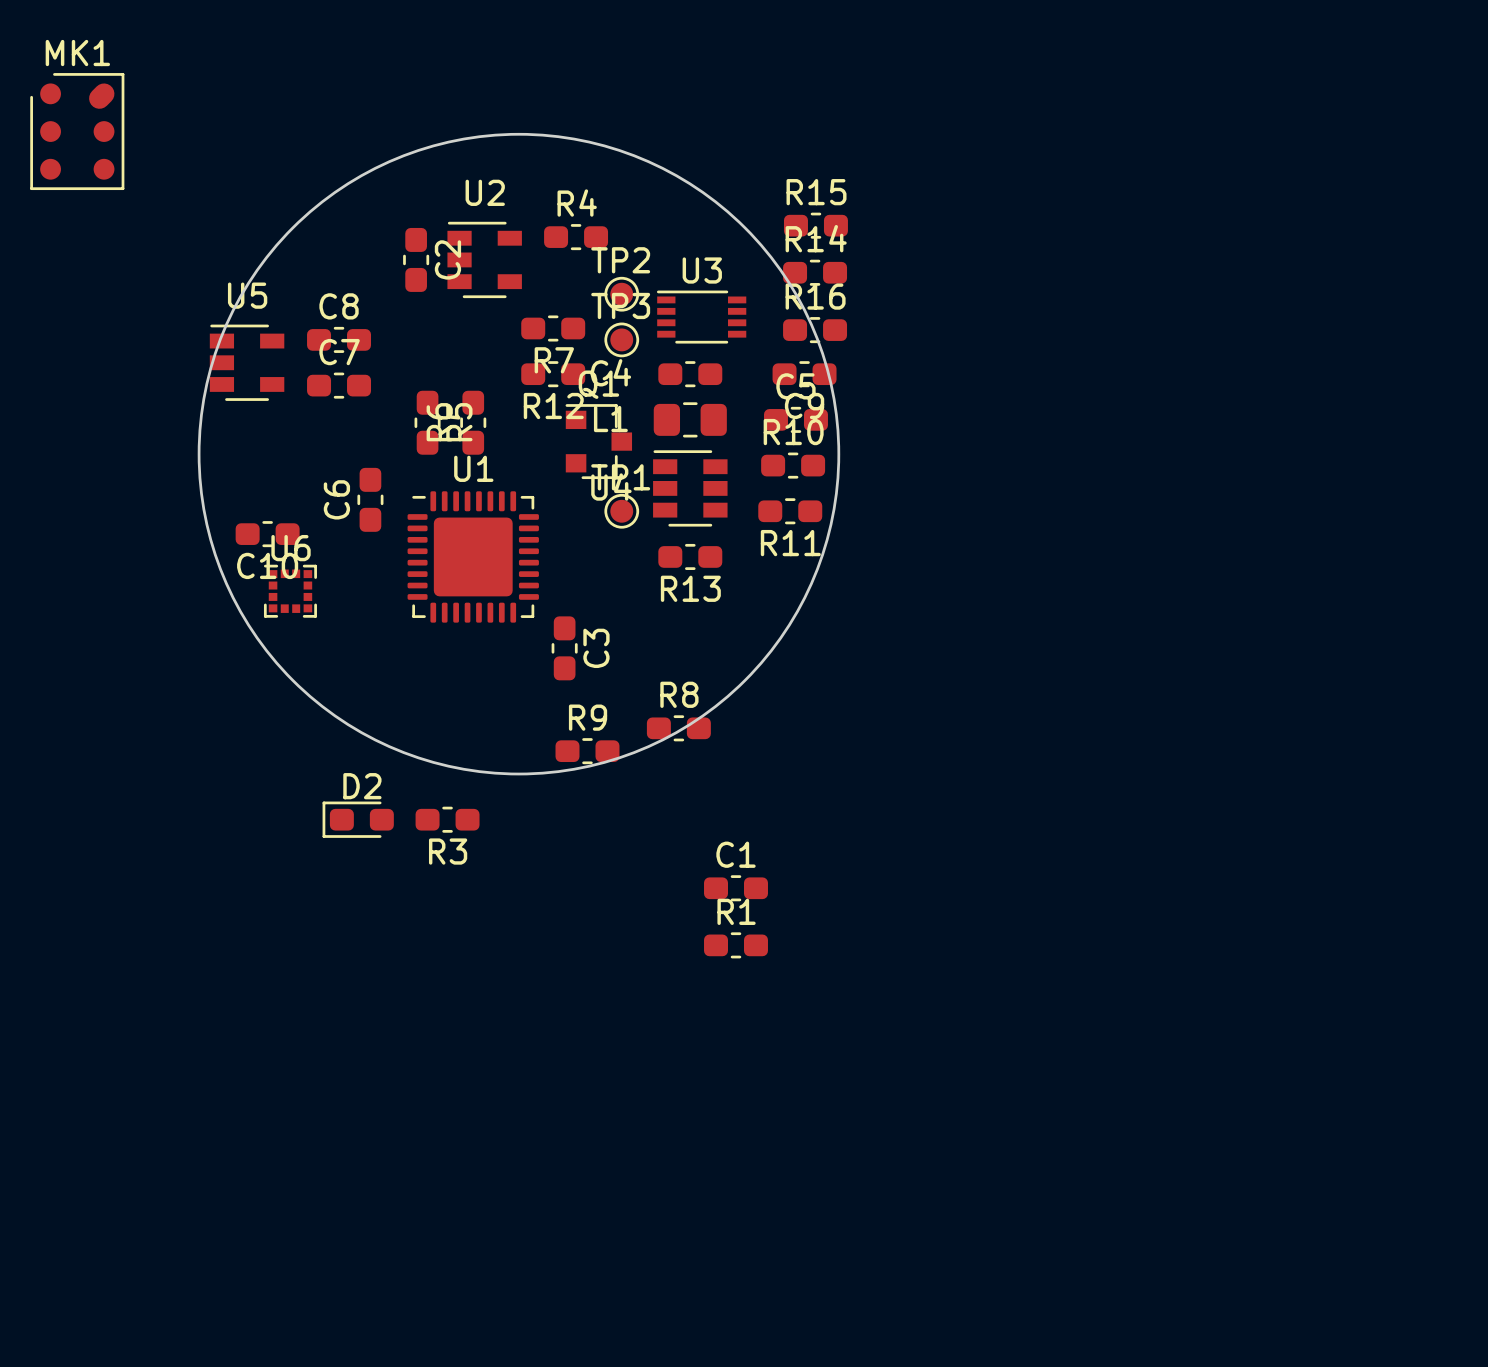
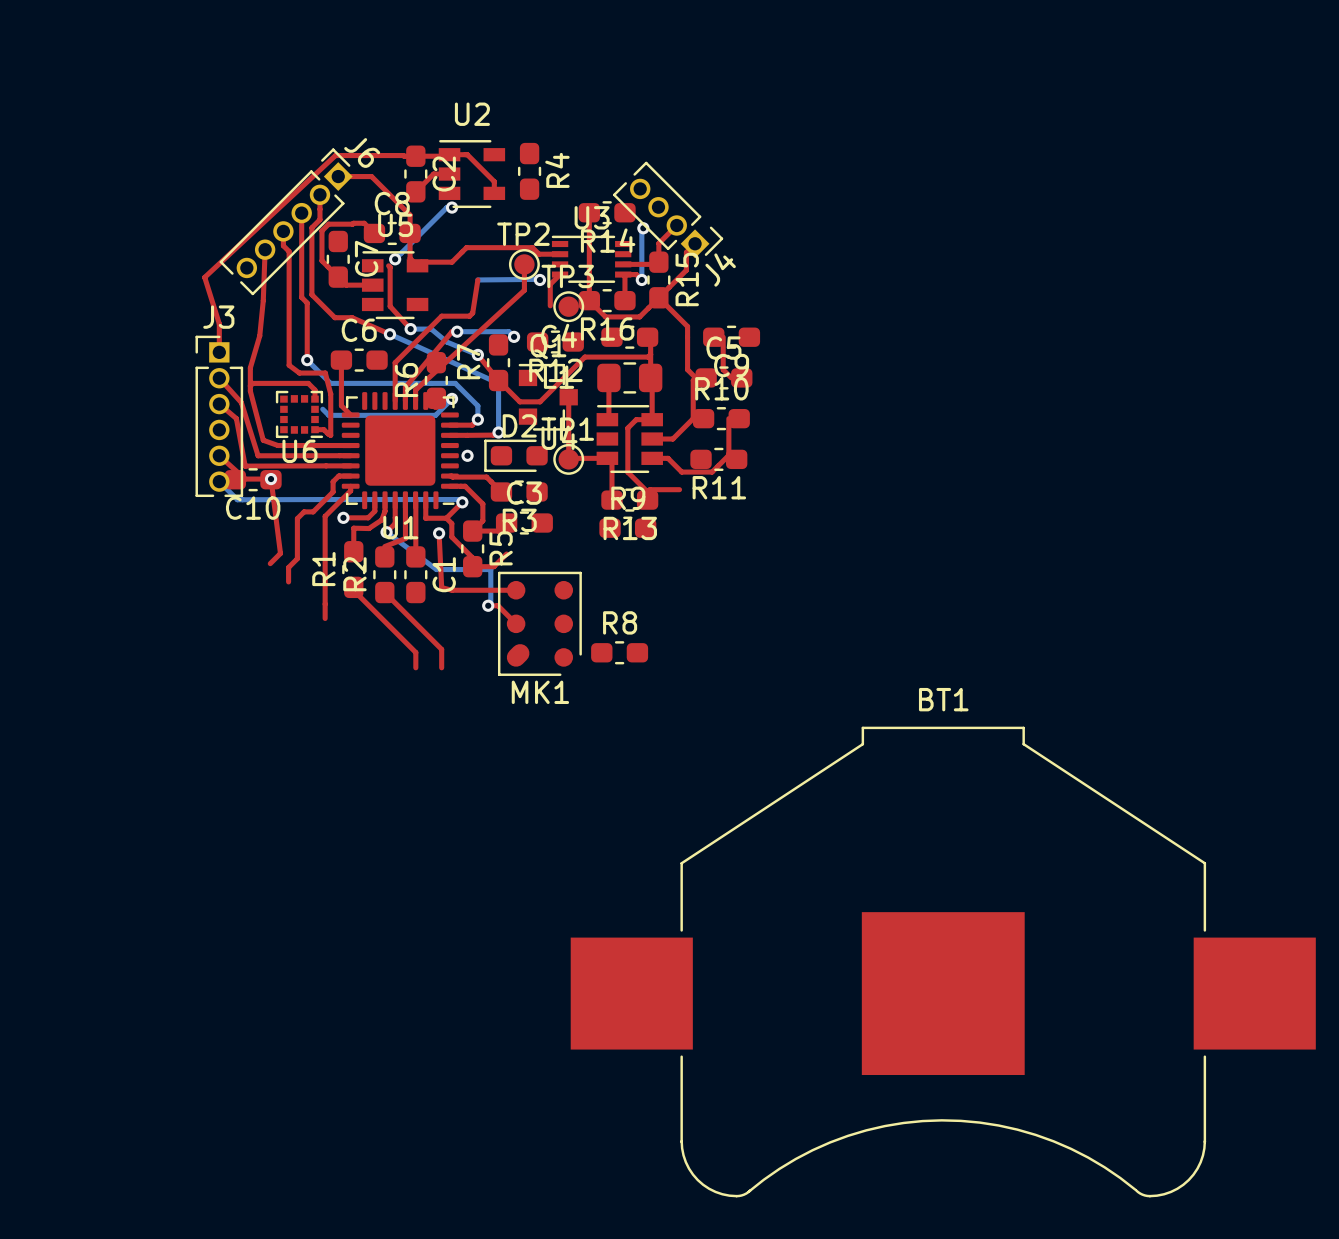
MK1 rotation: 0° (77, 131) -> 180° (539, 623)
MK1 position: (77, 131) -> (539, 623)
round board edge: [197, 132, 841, 776] -> none
top track: none -> (449, 174) (433, 174) (415, 191)
top track: none -> (338, 176) (371, 176) (410, 215) (410, 258) (417, 265) (421, 262) (452, 262) (466, 247) (532, 247) (539, 254) (560, 254)
top track: none -> (494, 193) (494, 181) (467, 154) (335, 155) (204, 277) (219, 323) (219, 352)
top track: none -> (319, 194) (319, 219) (311, 227) (311, 294) (334, 317) (352, 317) (389, 334)
R15 rotation: 0° (815, 225) -> 90° clockwise (658, 279)
R15 position: (815, 225) -> (658, 279)
bottom track: none -> (452, 207) (446, 207) (395, 259)
via: none -> (452, 207)
J4: none -> (668, 209)
top track: none -> (301, 213) (301, 297) (307, 303) (307, 360)
top track: none -> (589, 212) (589, 300) (605, 316) (639, 316) (686, 270) (686, 252) (695, 243)
R4 rotation: 0° (576, 237) -> 90° clockwise (529, 171)
R4 position: (576, 237) -> (529, 171)
R14 name position: R14 (816, 238) -> R14 (608, 240)
J6: none -> (286, 221)
top track: none -> (676, 225) (658, 243) (658, 262) (656, 264) (623, 264)
bottom track: none -> (643, 228) (641, 279)
via: none -> (643, 228)
top track: none -> (283, 231) (283, 245) (289, 251) (289, 365) (299, 373) (325, 373) (330, 393) (330, 435) (323, 429) (315, 429)
top track: none -> (374, 233) (364, 223) (328, 224) (321, 230) (321, 260) (346, 285) (372, 285)
C2 position: (416, 259) -> (415, 174)
U2 position: (484, 259) -> (471, 174)
R14 position: (815, 272) -> (607, 212)
top track: none -> (265, 249) (259, 335) (250, 367) (250, 391) (263, 440) (277, 445) (350, 445)
via: none -> (395, 259)
top track: none -> (524, 264) (524, 290) (415, 390) (415, 400)
top track: none -> (388, 265) (390, 306) (410, 329)
TP2 position: (621, 294) -> (524, 264)
R16 name position: R16 (815, 296) -> R16 (607, 329)
top track: none -> (560, 274) (550, 284) (550, 305)
top track: none -> (477, 279) (472, 313) (469, 316) (441, 316) (395, 362) (395, 400)
bottom track: none -> (477, 279) (539, 279)
via: none -> (539, 279)
top track: none -> (641, 279) (636, 274) (623, 274) (624, 276) (624, 300)
via: none -> (641, 279)
U3 position: (701, 317) -> (591, 259)
R7 rotation: 0° (553, 328) -> 90° clockwise (498, 362)
R7 position: (553, 328) -> (498, 362)
top track: none -> (658, 297) (687, 326) (687, 369) (695, 377) (693, 380) (693, 418) (672, 439) (652, 439)
R16 position: (815, 330) -> (607, 300)
C8 position: (339, 339) -> (392, 233)
U5 position: (247, 362) -> (395, 285)
bottom track: none -> (410, 329) (431, 329) (446, 342) (477, 354)
via: none -> (410, 329)
top track: none -> (457, 331) (452, 331) (405, 387) (405, 400)
bottom track: none -> (457, 331) (508, 331) (514, 336)
via: none -> (457, 331)
bottom track: none -> (389, 334) (498, 383) (498, 432)
via: none -> (389, 334)
via: none -> (514, 336)
R12 position: (553, 374) -> (555, 342)
top track: none -> (647, 337) (650, 340) (652, 419) (636, 419) (627, 428) (627, 472) (647, 491) (649, 489) (679, 489)
top track: none -> (723, 337) (723, 369) (731, 377)
C7 rotation: 0° (339, 385) -> 90° clockwise (338, 259)
C7 position: (339, 385) -> (338, 259)
top track: none -> (650, 354) (648, 357) (584, 357) (540, 401) (519, 401) (498, 380) (477, 354)
via: none -> (477, 354)
bottom track: none -> (307, 360) (330, 383) (455, 383) (477, 405) (477, 419)
via: none -> (307, 360)
top track: none -> (341, 360) (341, 405) (350, 414)
top track: none -> (608, 377) (607, 419)
top track: none -> (219, 378) (241, 402) (258, 455) (350, 455)
R5 position: (427, 422) -> (472, 548)
top track: none -> (250, 385) (252, 383) (308, 383) (315, 390) (315, 399)
top track: none -> (568, 397) (568, 459) (607, 458) (611, 462) (611, 491)
bottom track: none -> (452, 398) (435, 415) (328, 415) (322, 409)
via: none -> (452, 398)
top track: none -> (219, 404) (236, 418) (245, 466) (350, 465)
J3: none -> (219, 416)
top track: none -> (728, 418) (728, 455) (712, 472) (681, 472) (668, 458) (652, 458)
top track: none -> (477, 419) (472, 425) (449, 425)
via: none -> (477, 419)
top track: none -> (498, 432) (493, 435) (449, 435)
via: none -> (498, 432)
C6 rotation: 0° (370, 499) -> 90° clockwise (359, 360)
C6 position: (370, 499) -> (359, 360)
top track: none -> (219, 455) (245, 479) (271, 479) (280, 553) (270, 563)
via: none -> (467, 455)
top track: none -> (350, 476) (338, 476) (333, 481) (333, 491) (313, 511) (304, 511) (297, 518) (297, 558) (288, 567) (288, 581)
top track: none -> (449, 476) (486, 477) (501, 491)
via: none -> (271, 479)
bottom track: none -> (219, 481) (237, 499) (459, 499) (462, 502)
top track: none -> (350, 486) (350, 490) (325, 516) (325, 618)
top track: none -> (449, 486) (465, 486) (482, 504) (482, 520) (472, 531) (498, 531) (506, 523)
U1 rotation: 0° (473, 556) -> 180° (400, 450)
top track: none -> (374, 500) (374, 511) (368, 517) (343, 517)
top track: none -> (385, 500) (385, 511) (381, 520) (368, 528) (353, 528) (353, 541)
top track: none -> (395, 500) (395, 523) (386, 532)
top track: none -> (405, 500) (405, 538) (384, 546)
top track: none -> (415, 500) (415, 546)
top track: none -> (425, 500) (425, 518) (446, 518)
top track: none -> (462, 502) (446, 518)
via: none -> (462, 502)
via: none -> (343, 517)
top track: none -> (446, 518) (451, 523) (451, 537) (472, 557) (472, 566) (493, 566) (506, 554)
U6 rotation: 0° (290, 591) -> 180° (299, 414)
U6 position: (290, 591) -> (299, 414)
bottom track: none -> (386, 532) (436, 569) (490, 569) (490, 603) (488, 605)
via: none -> (386, 532)
top track: none -> (439, 533) (441, 587) (452, 590) (516, 590)
via: none -> (439, 533)
R2: none -> (384, 574)
C3 rotation: 0° (564, 648) -> 90° clockwise (524, 523)
C3 position: (564, 648) -> (524, 523)
C3 name position: C3 (596, 648) -> C3 (524, 493)
top track: none -> (353, 587) (353, 590) (415, 652) (415, 667)
top track: none -> (384, 592) (441, 649) (441, 667)
top track: none -> (488, 605) (498, 605) (516, 623)
via: none -> (488, 605)
R9 position: (587, 751) -> (627, 528)
D2 position: (358, 819) -> (515, 455)
R3 position: (447, 819) -> (519, 491)
C1 rotation: 0° (736, 888) -> 90° clockwise (415, 574)
C1 position: (736, 888) -> (415, 574)
R1 name position: R1 (736, 911) -> R1 (323, 569)
R1 rotation: 0° (736, 945) -> 90° clockwise (353, 569)
R1 position: (736, 945) -> (353, 569)
BT1: none -> (943, 962)

